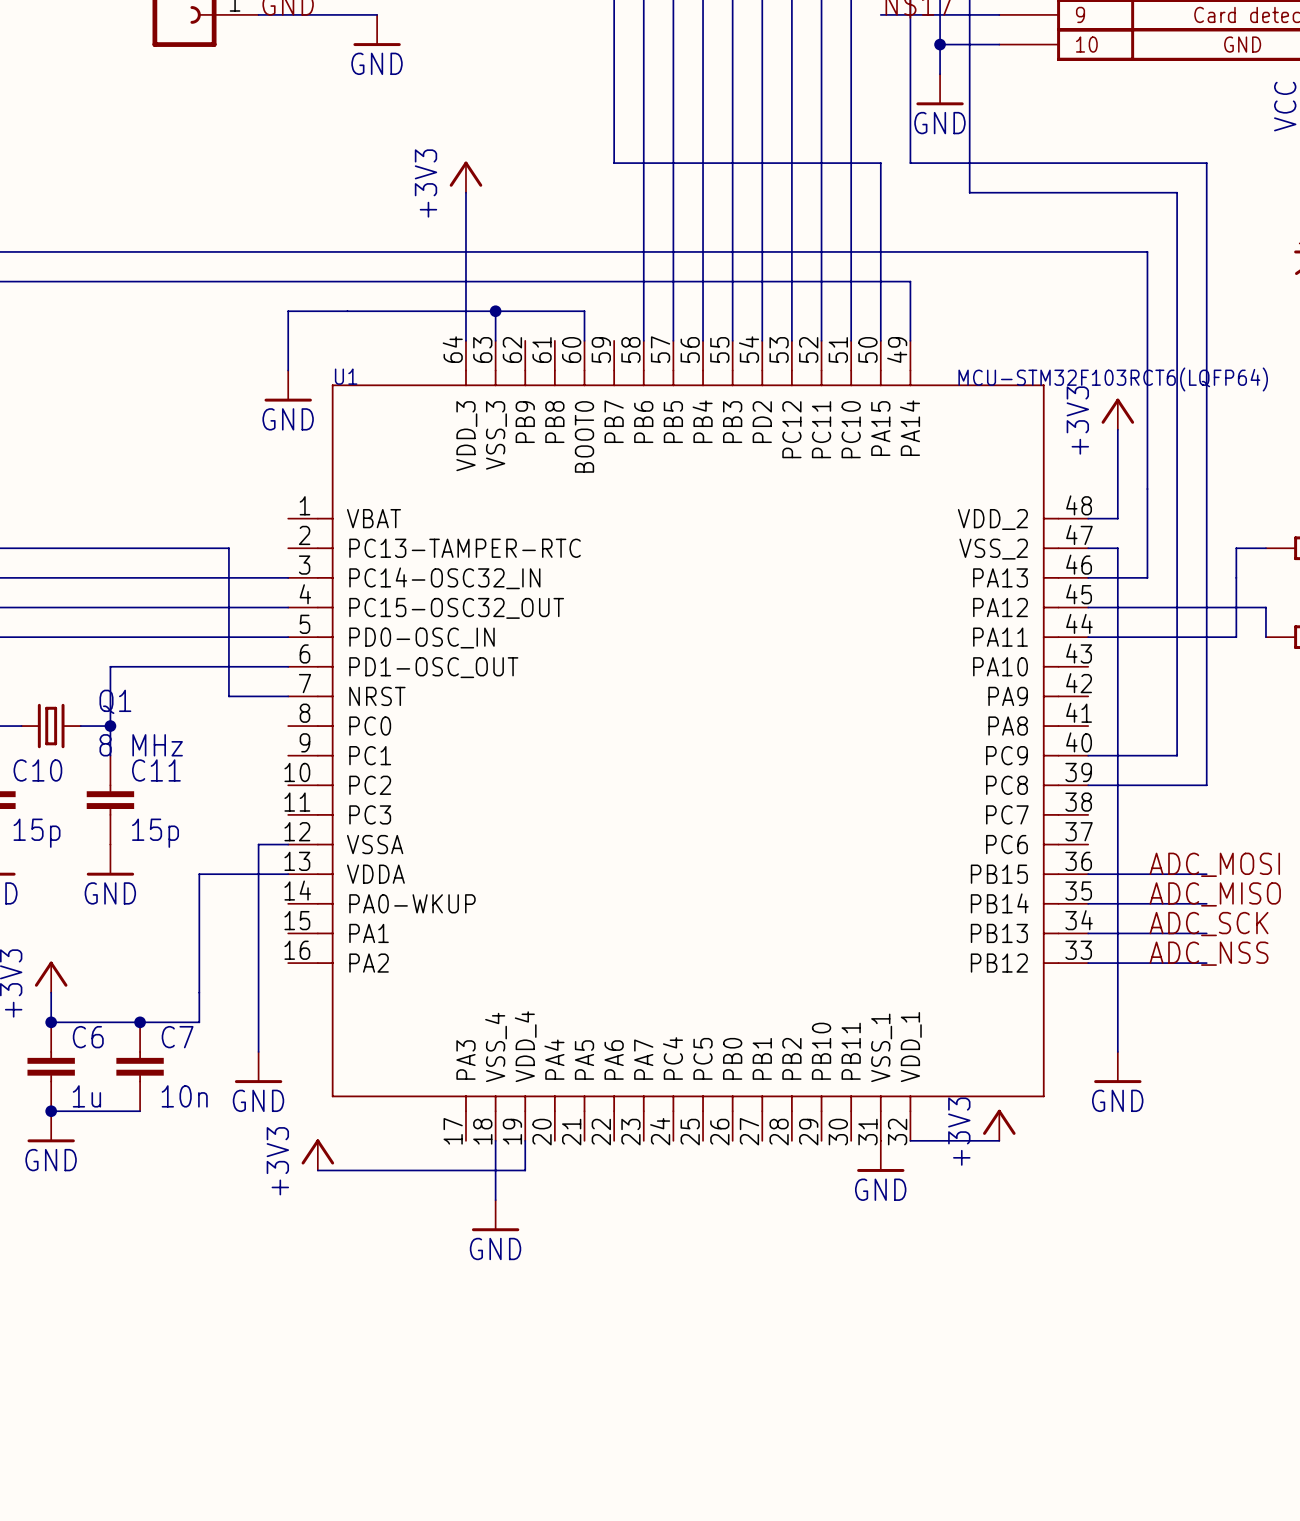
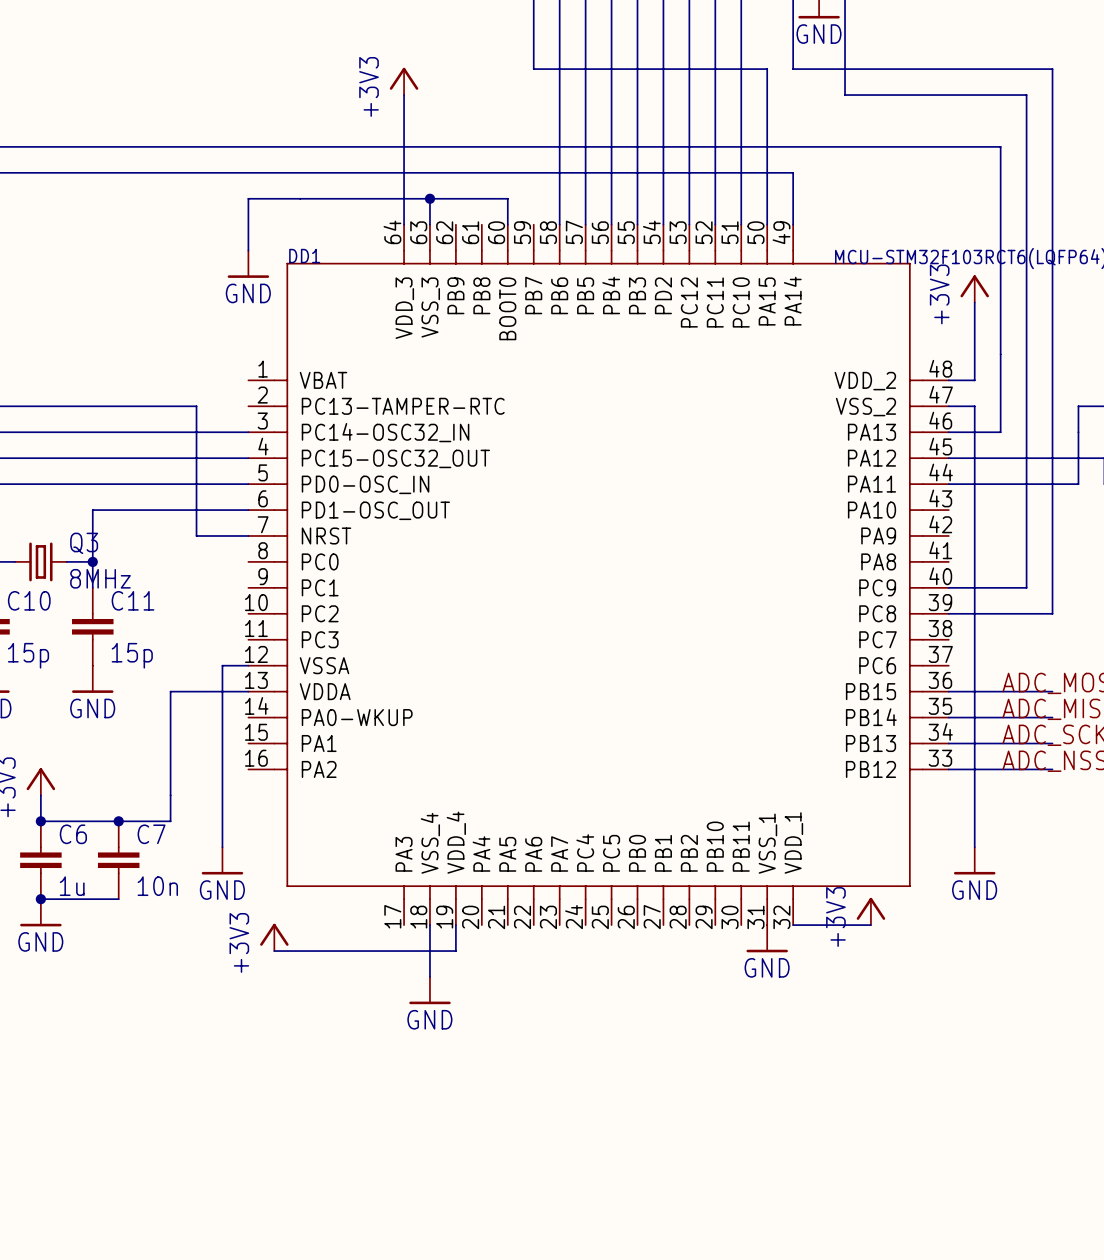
U1 name: U1 (346, 376) -> DD1 (304, 256)
Q1 name: Q1 (115, 701) -> Q3 (84, 543)
Q1 value: 8 MHz (141, 745) -> 8MHz (100, 578)

